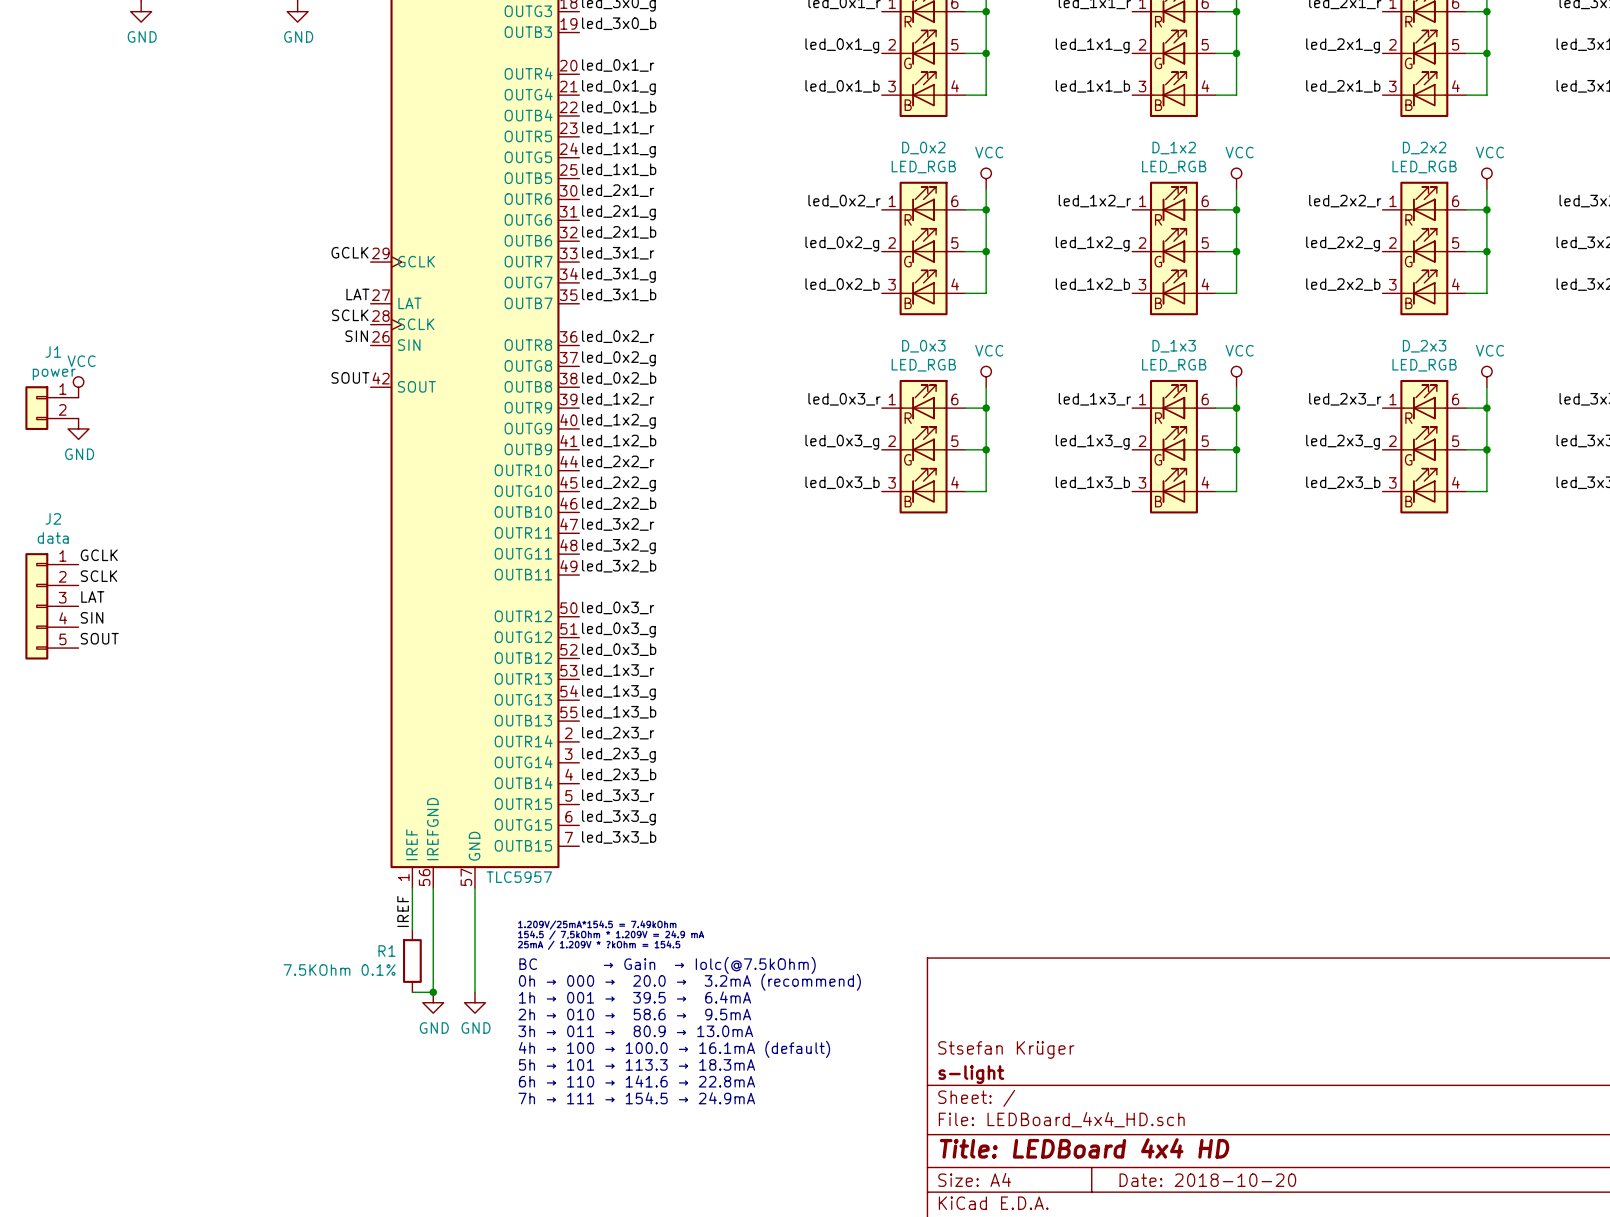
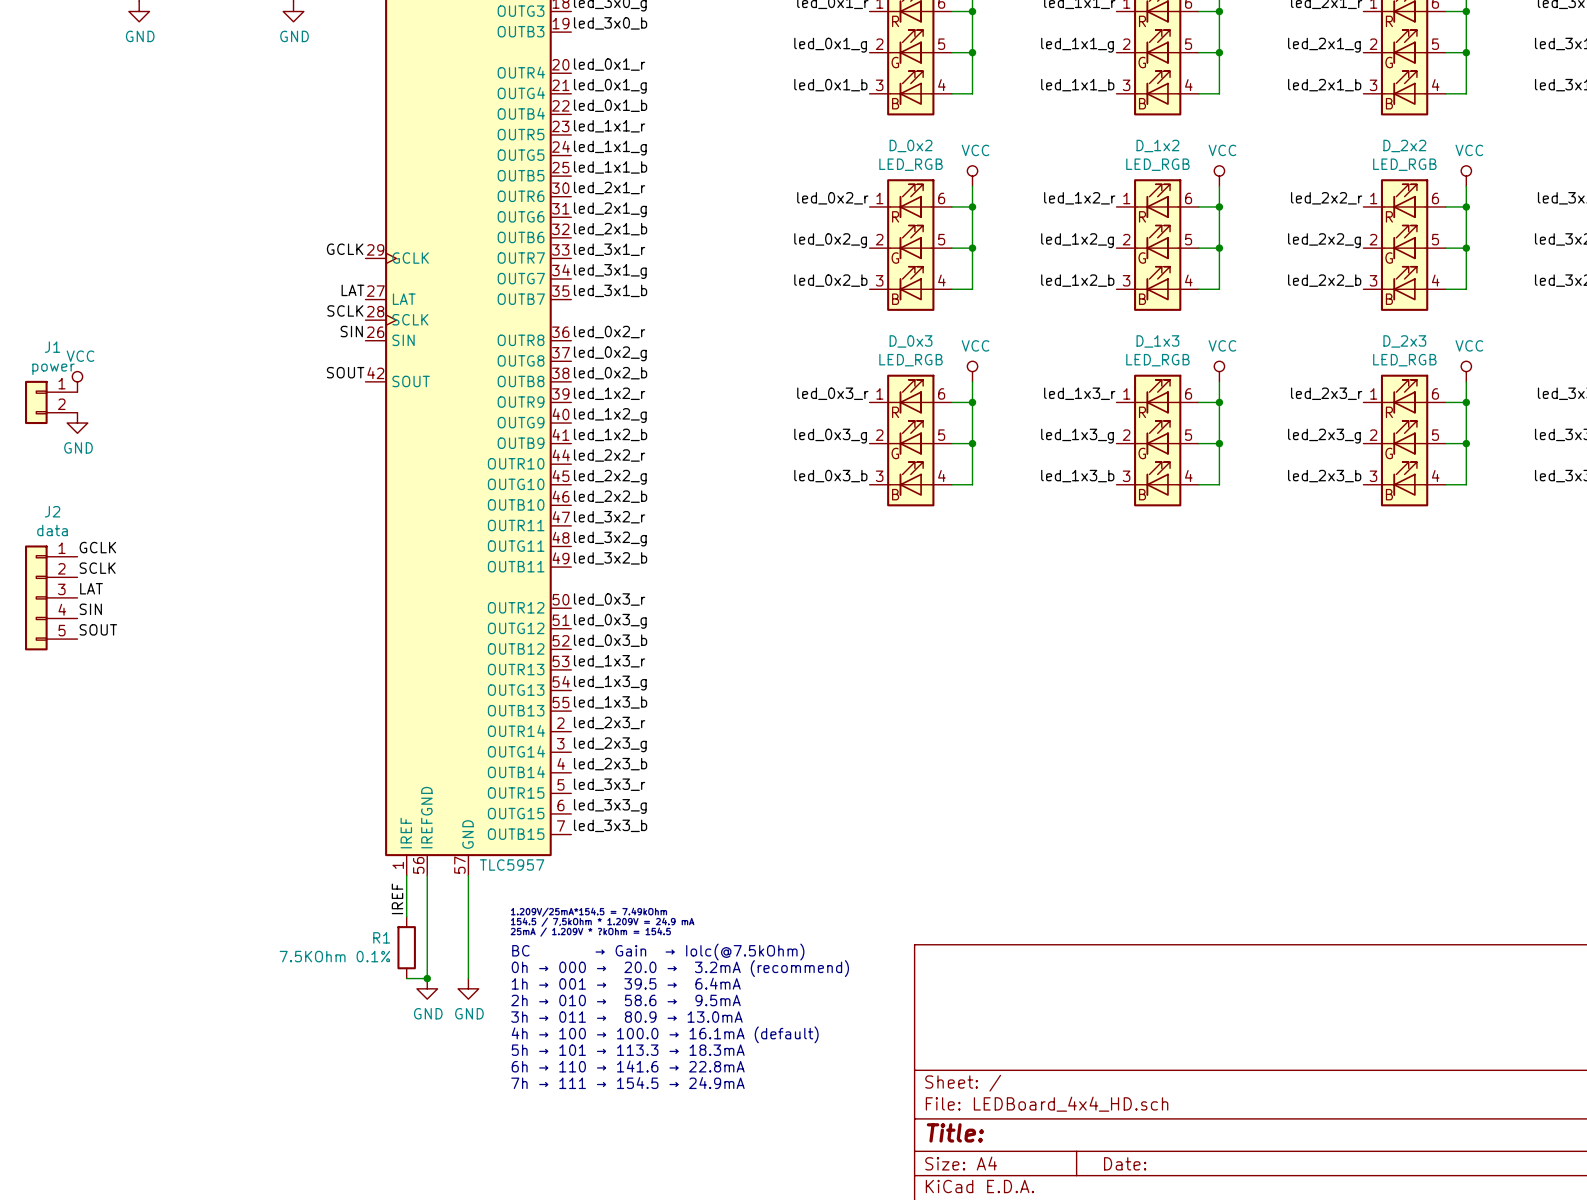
title block: Stsefan Krüger (1006, 1049) -> none
title block: s-light (971, 1074) -> none
title block: Title: LEDBoard 4x4 HD (1084, 1148) -> Title: (955, 1132)
title block: Date: 2018-10-20 (1207, 1180) -> Date: (1125, 1163)

